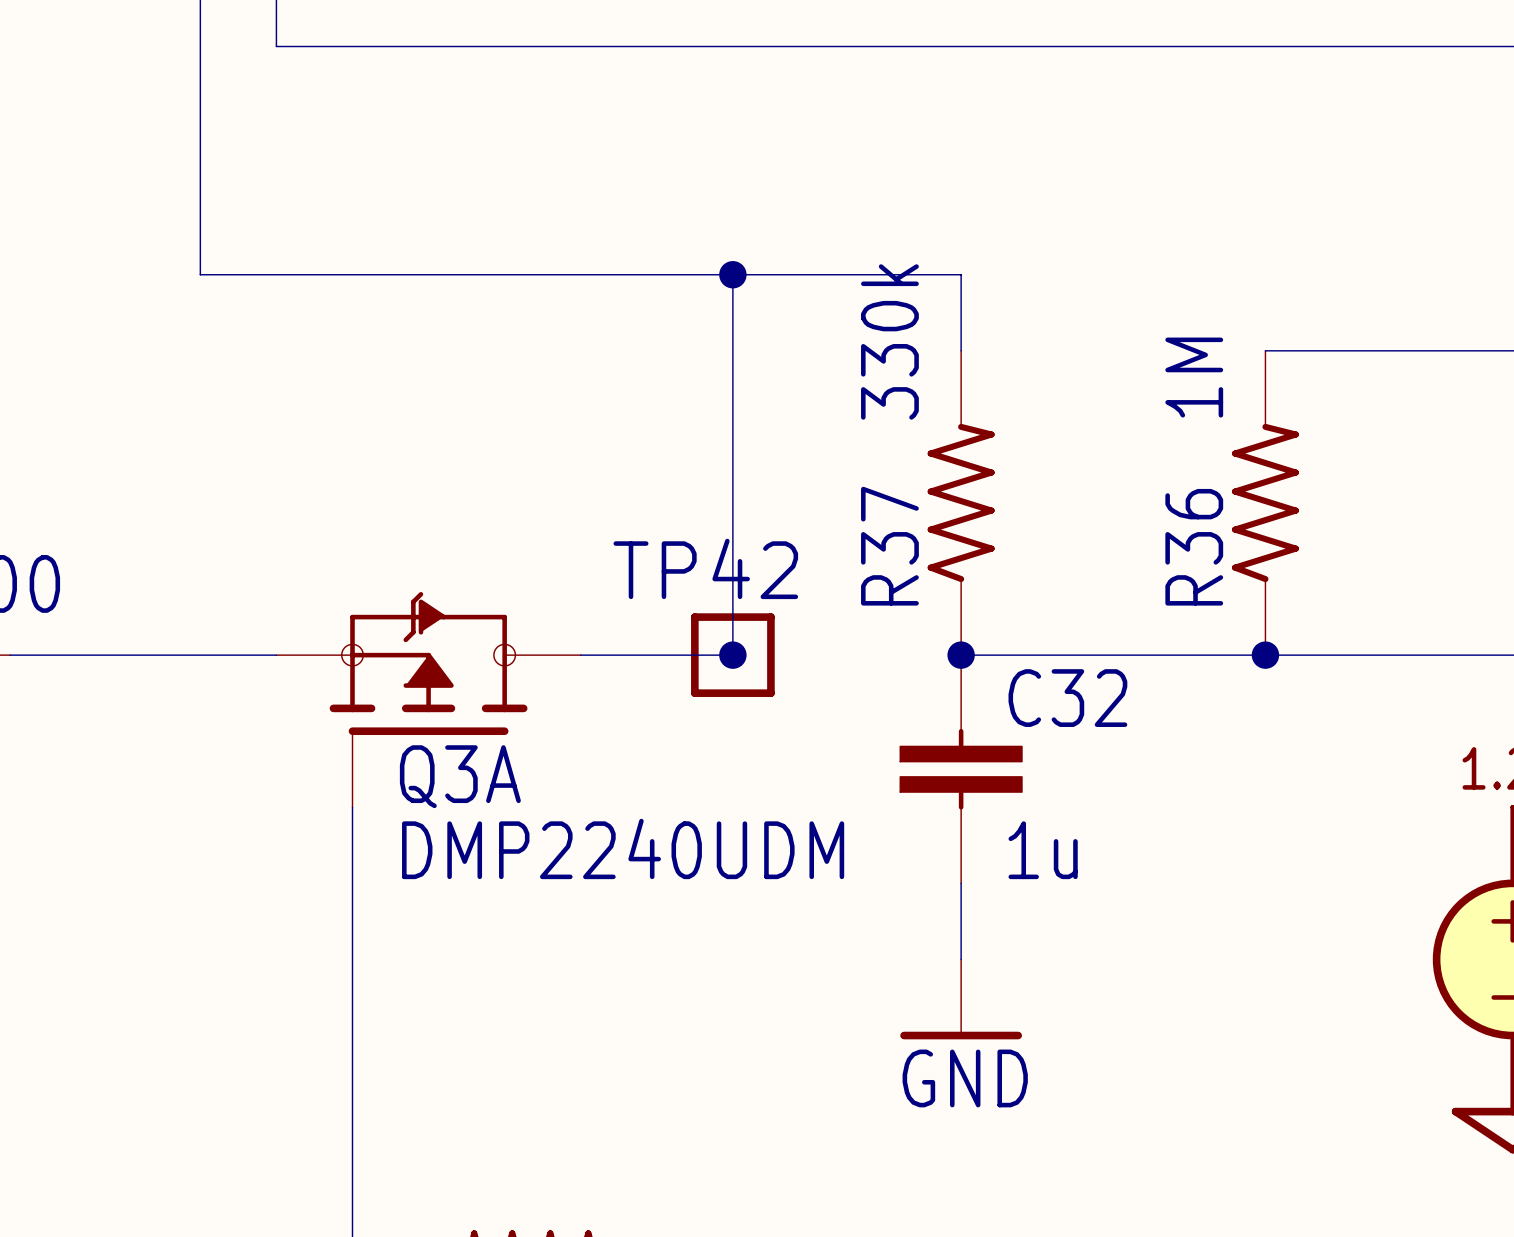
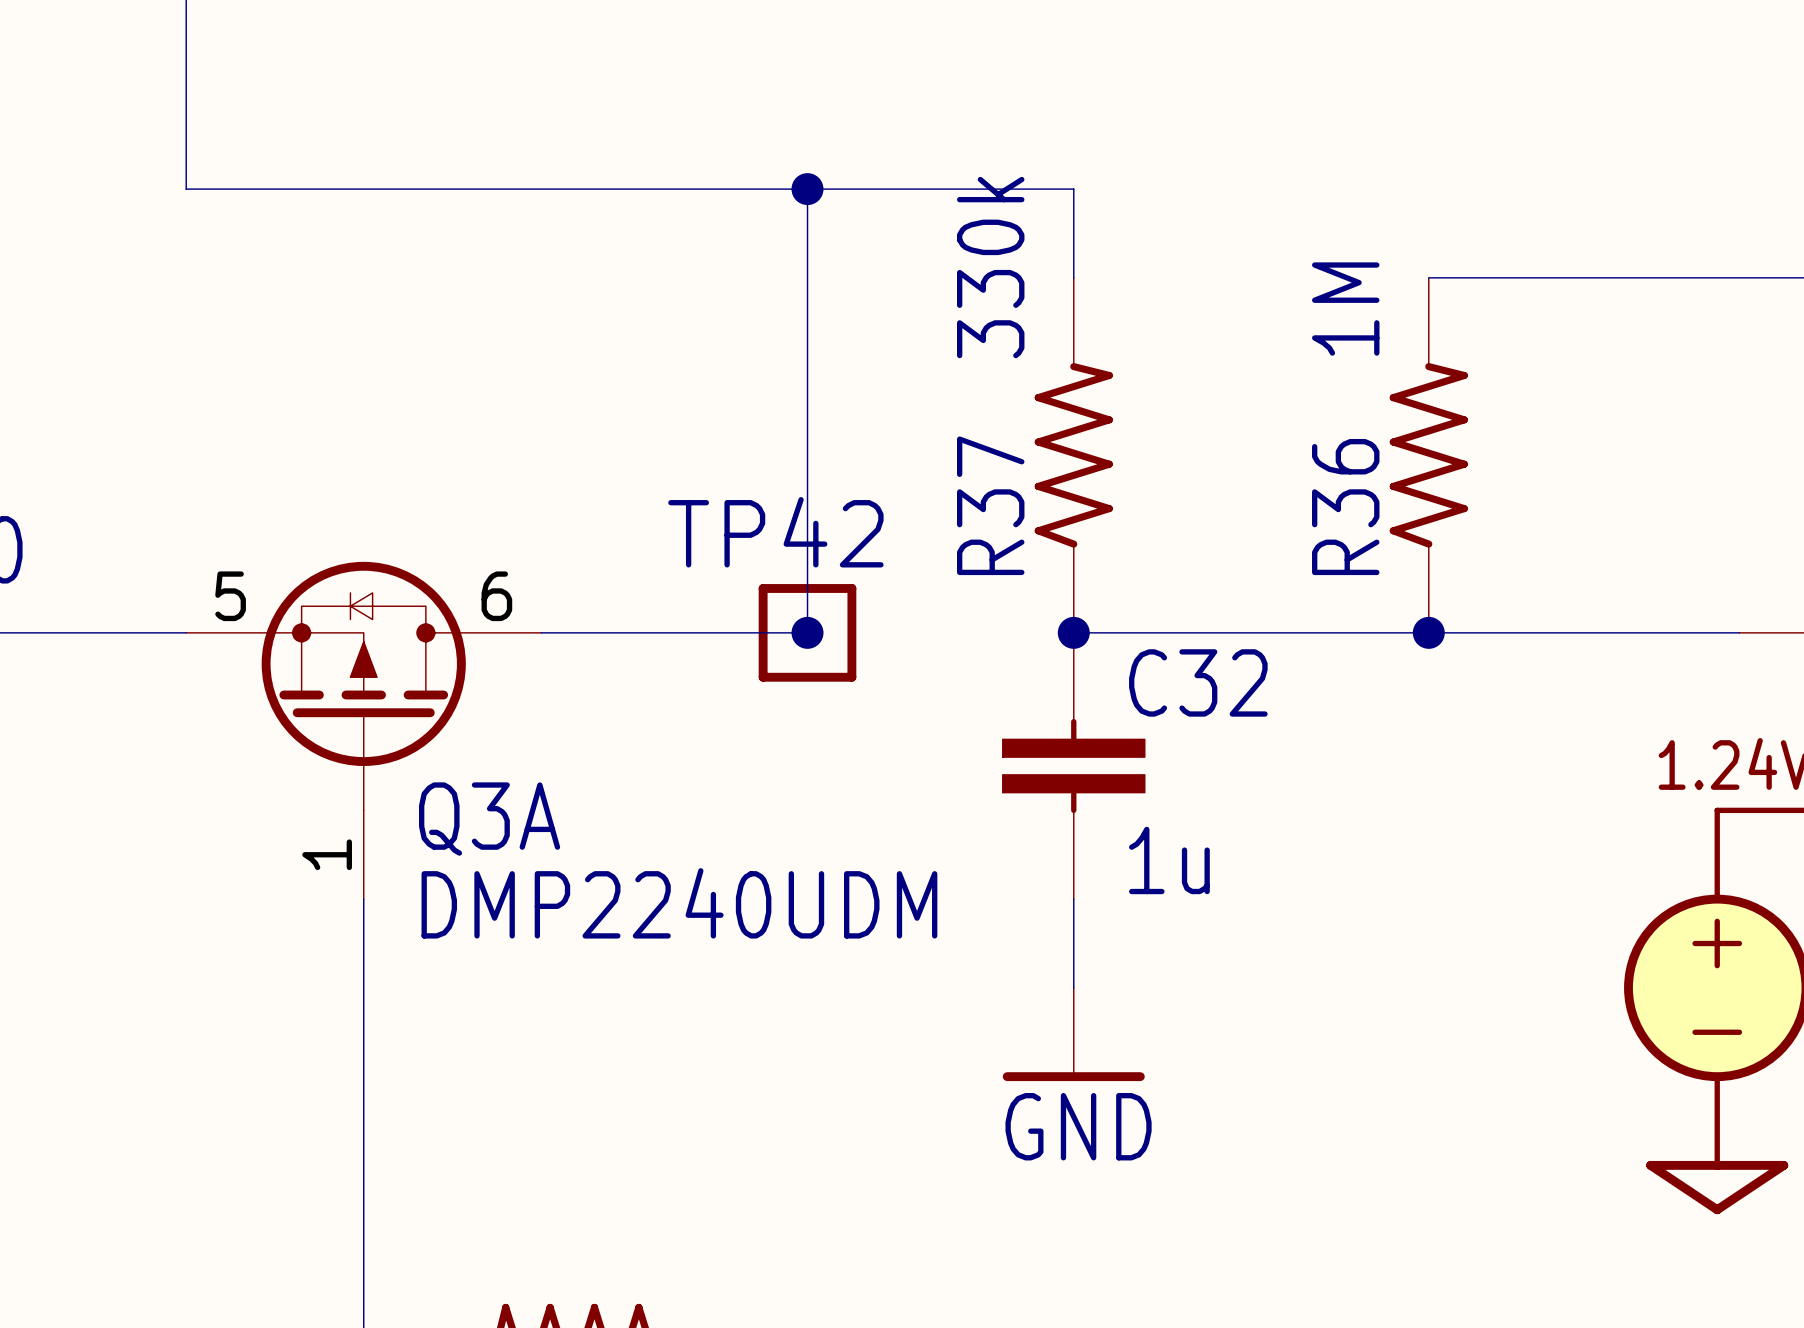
Q3A symbol: [276, 591, 581, 808] -> [186, 561, 542, 900]
Q3A name position: Q3A (460, 776) -> Q3A (489, 819)
Q3A value position: DMP2240UDM (623, 848) -> DMP2240UDM (679, 903)

